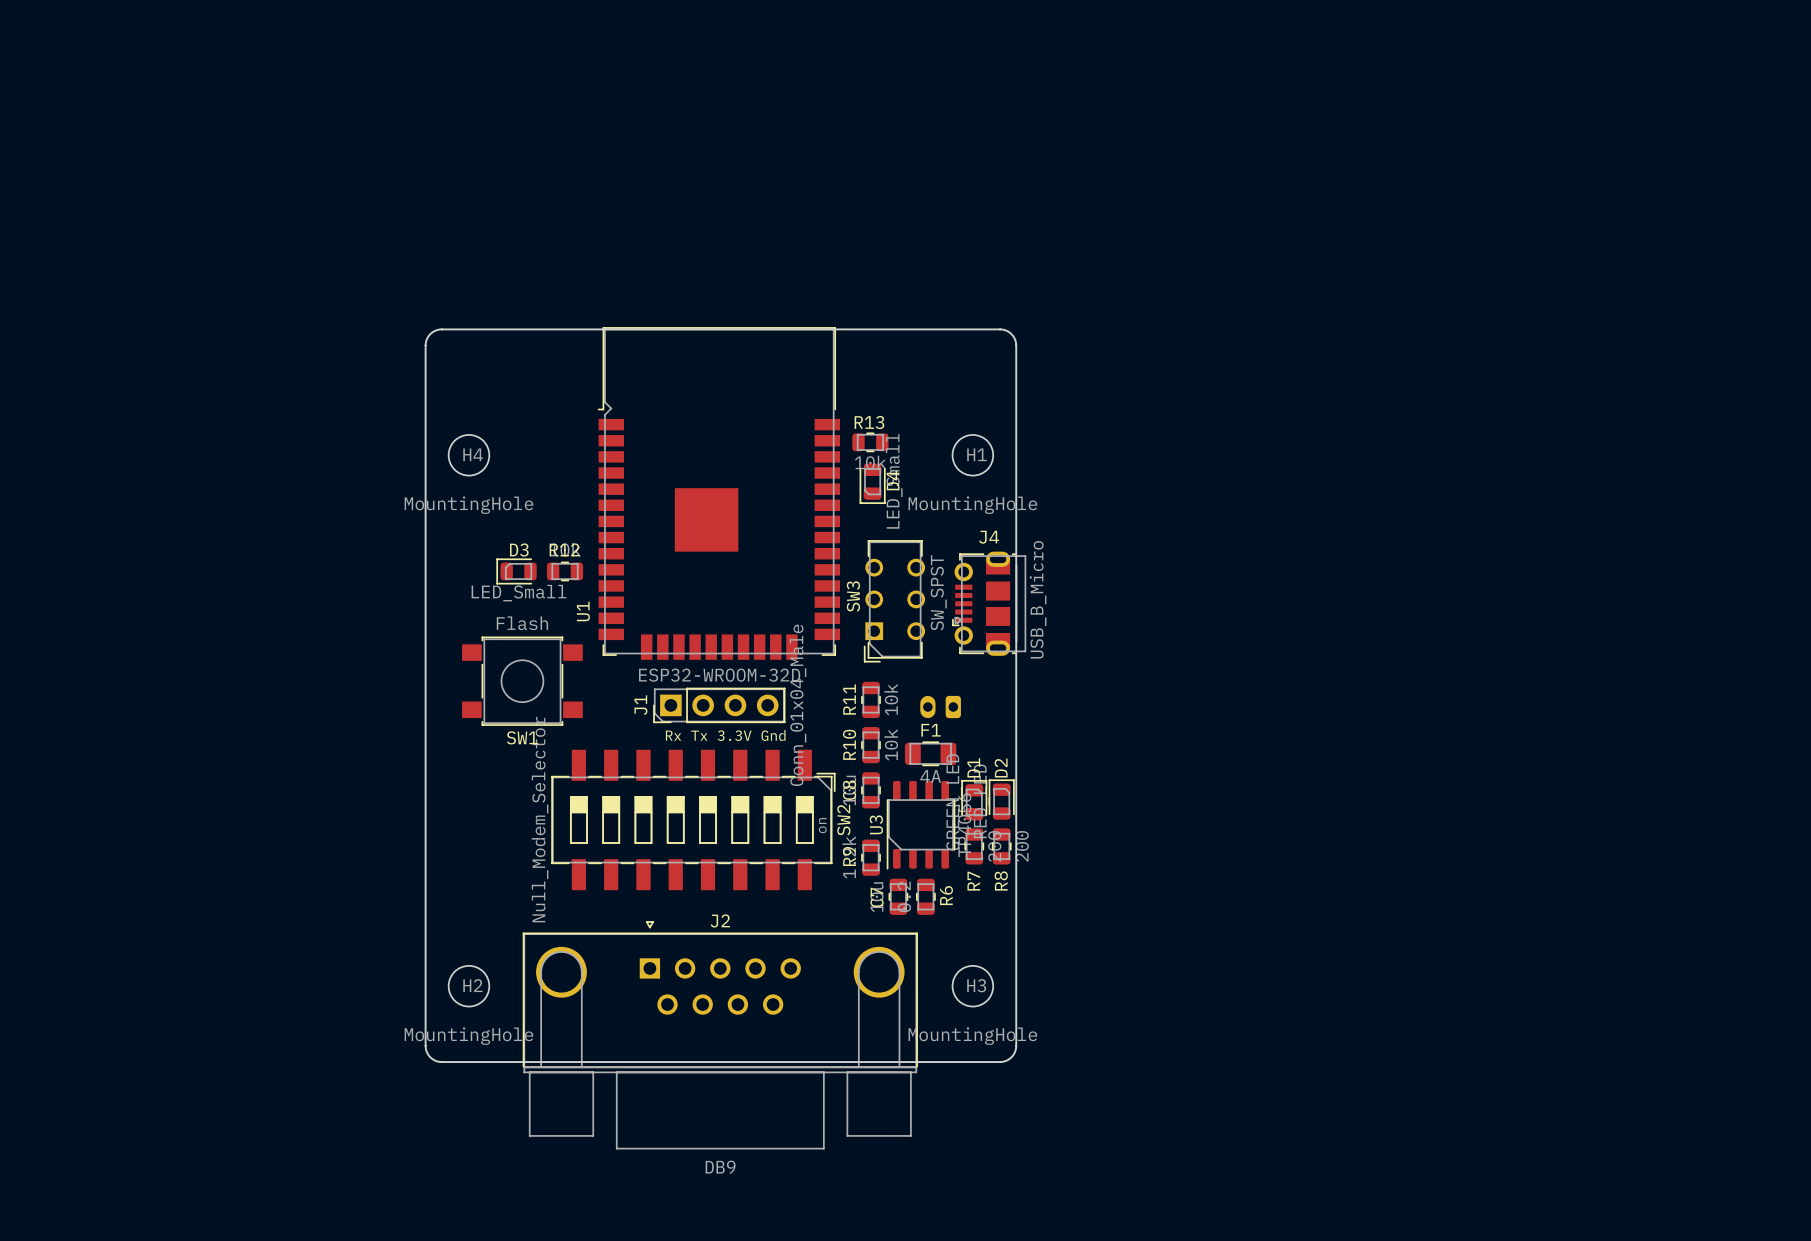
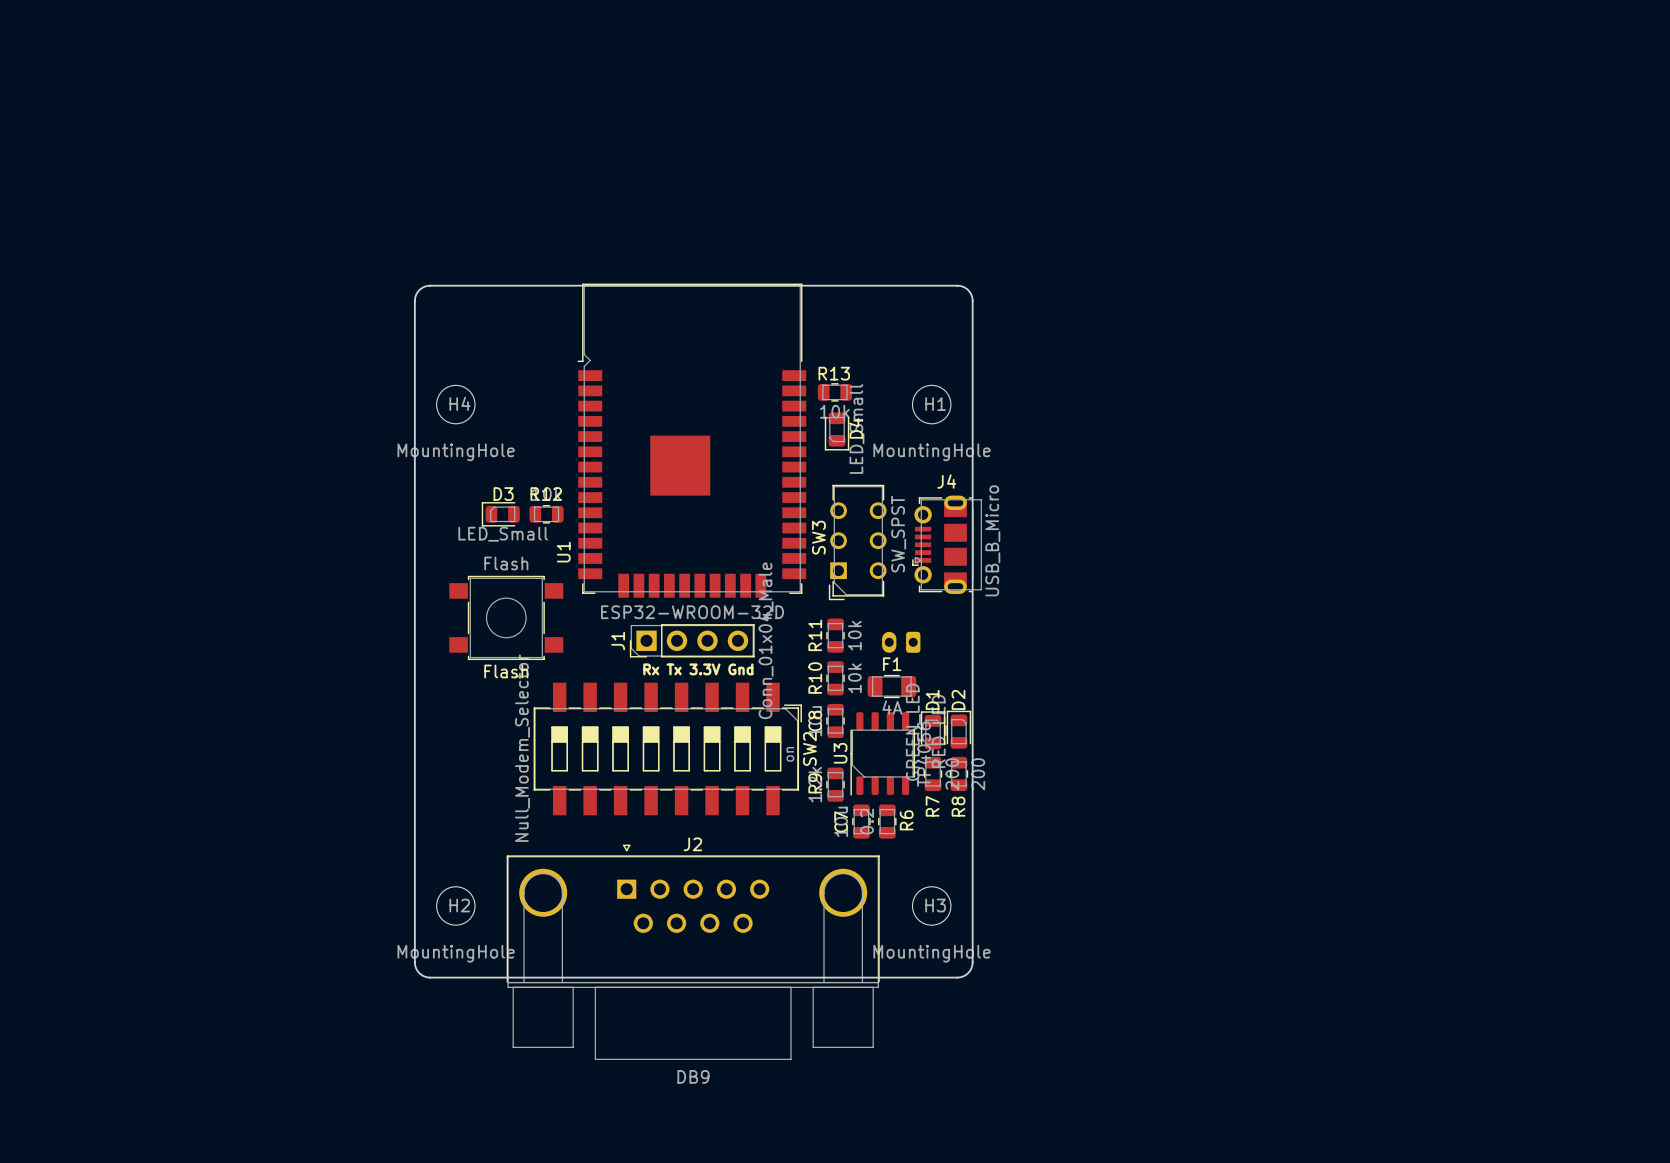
SW1 name: SW1 (522, 737) -> Flash (506, 671)

